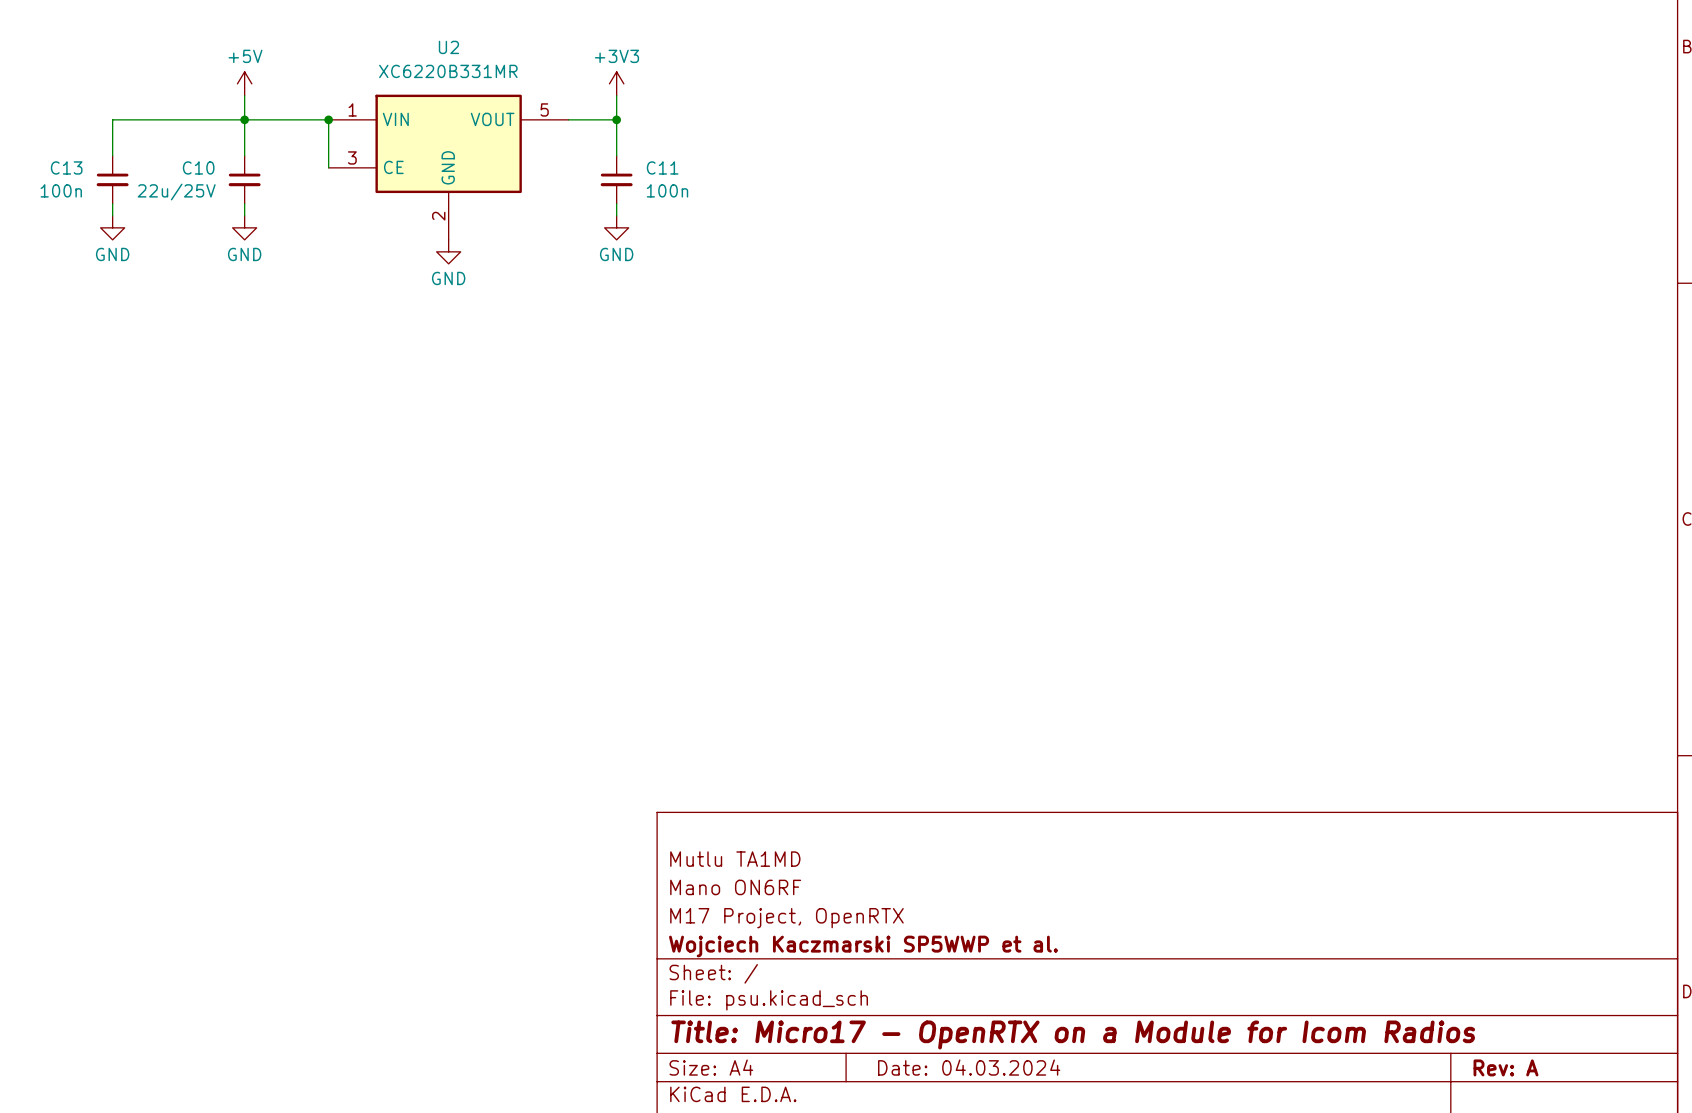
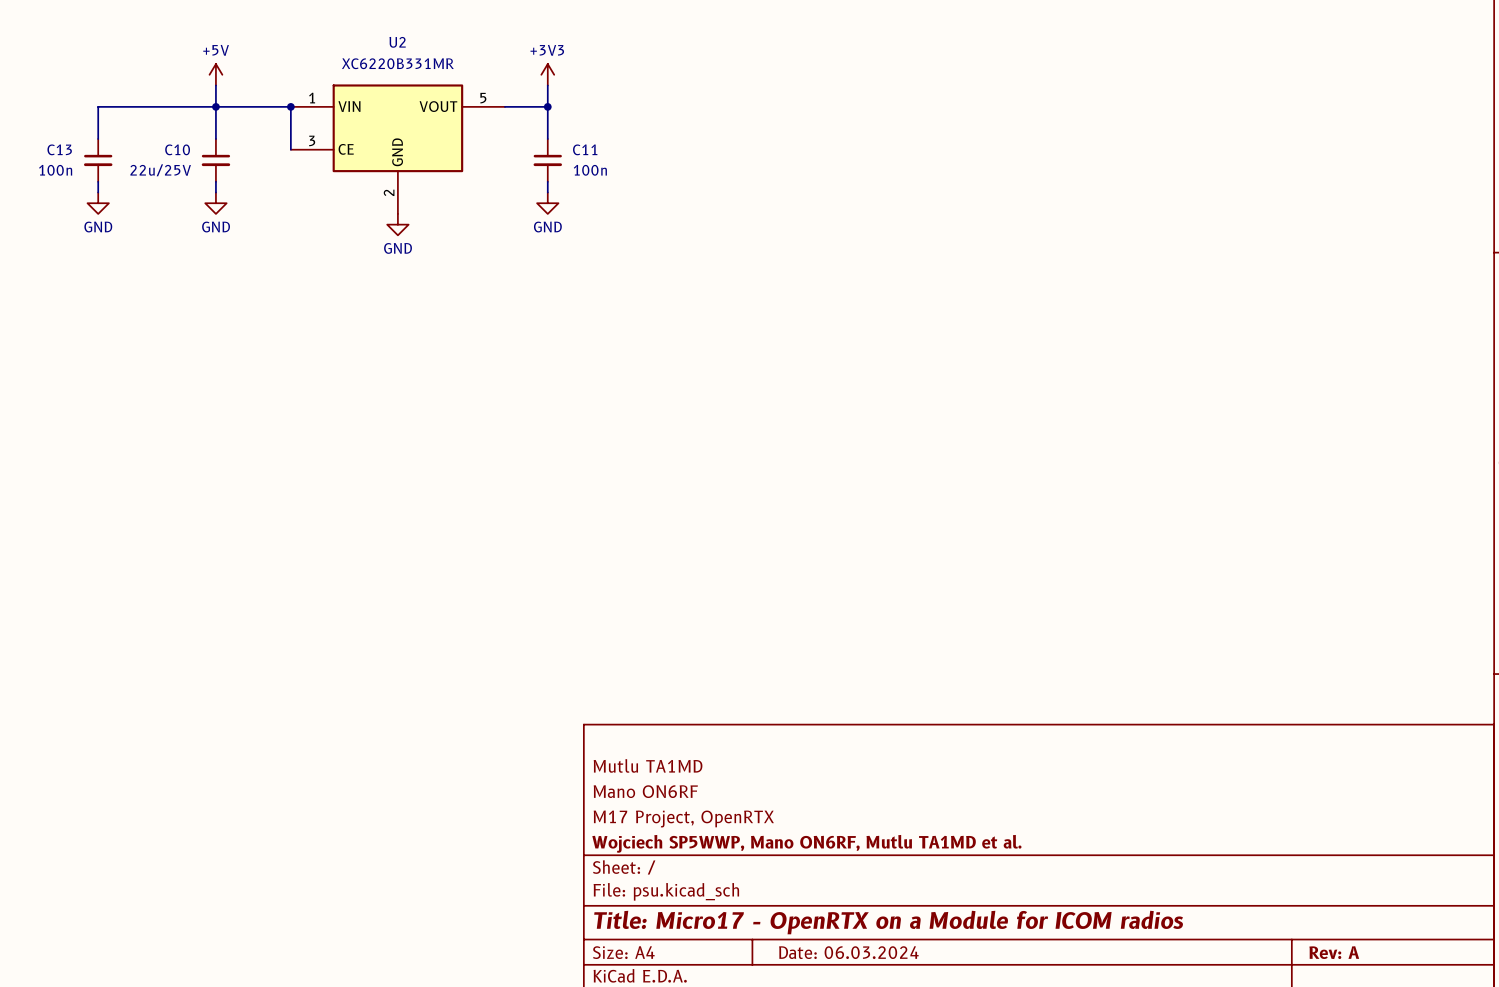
title block: Wojciech Kaczmarski SP5WWP et al. (863, 946) -> Wojciech SP5WWP, Mano ON6RF, Mutlu TA1MD et al. (806, 843)
title block: Title: Micro17 - OpenRTX on a Module for Icom Radios (1073, 1034) -> Title: Micro17 - OpenRTX on a Module for ICOM radios (888, 922)
title block: Date: 04.03.2024 (969, 1067) -> Date: 06.03.2024 (848, 952)

